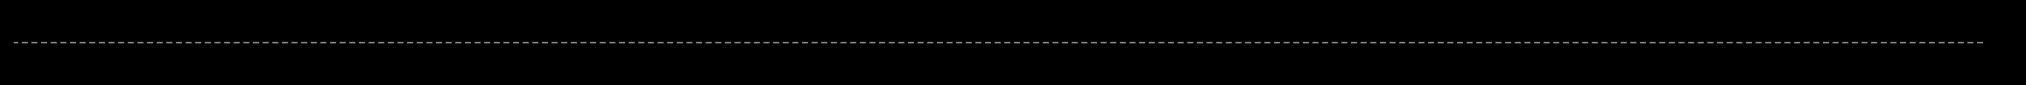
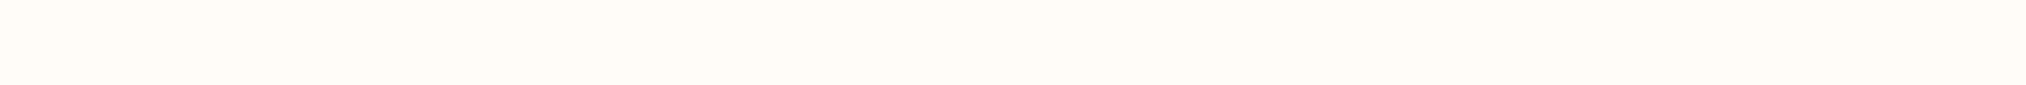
line: (13, 42) (1983, 42) -> none

